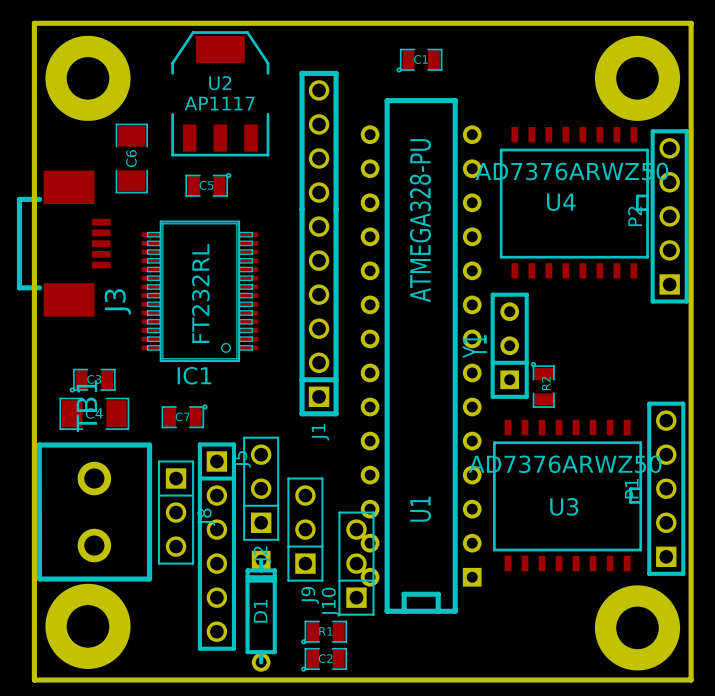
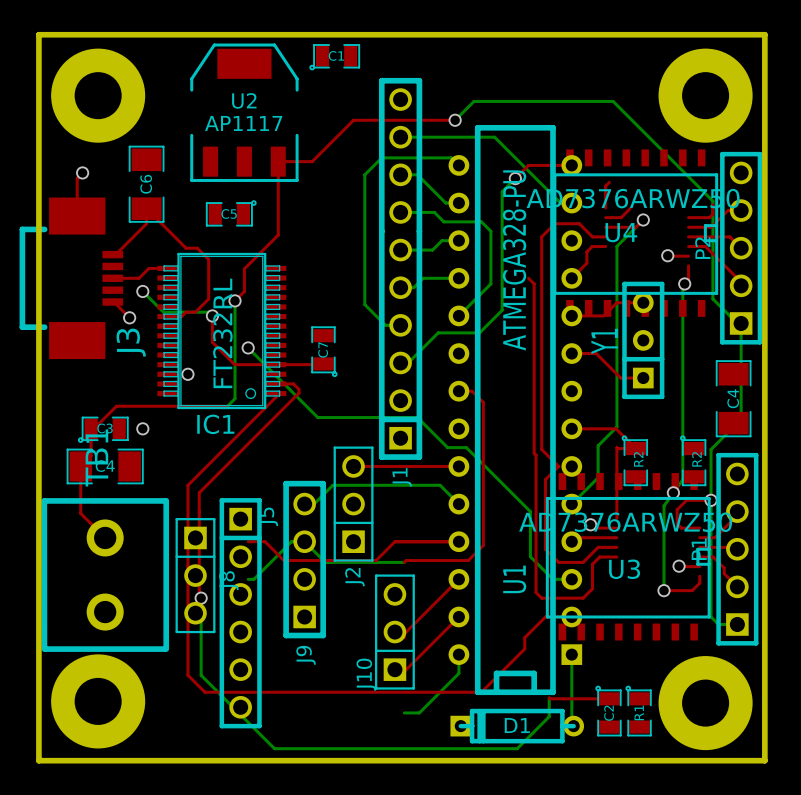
C1 position: (419, 60) -> (334, 57)
top track: none -> (455, 120) (353, 120) (312, 161) (278, 161) (278, 235) (244, 268) (244, 291) (235, 300)
bottom track: none -> (455, 120) (473, 101) (613, 101) (712, 201) (712, 299) (737, 323) (741, 323) (741, 419) (711, 449) (711, 616) (718, 624) (737, 624)
via: none -> (455, 120)
bottom track: none -> (400, 137) (494, 137) (560, 203) (571, 203)
bottom track: none -> (458, 165) (451, 157) (381, 157) (364, 174) (364, 304) (385, 325) (400, 325)
top track: none -> (571, 165) (528, 165) (515, 178)
top track: none -> (82, 172) (77, 178) (77, 216)
via: none -> (82, 172)
bottom track: none -> (400, 174) (417, 174) (445, 203) (458, 203)
bottom track: none -> (515, 178) (502, 191) (502, 310) (479, 332) (438, 332) (408, 362) (400, 362)
via: none -> (515, 178)
top track: none -> (609, 182) (605, 186) (605, 208)
top track: none -> (712, 204) (712, 214) (709, 217) (688, 217)
top track: none -> (630, 208) (621, 217) (605, 217)
top track: none -> (741, 210) (727, 210) (711, 227) (688, 227)
bottom track: none -> (400, 212) (434, 212) (443, 221) (481, 221) (490, 231) (490, 283) (458, 315)
top track: none -> (643, 219) (636, 227) (605, 227)
bottom track: none -> (643, 219) (616, 246) (616, 426) (598, 445) (598, 477) (571, 504)
via: none -> (643, 219)
top track: none -> (605, 236) (592, 236) (579, 223) (554, 223) (541, 236) (541, 449) (558, 466) (545, 479) (545, 549) (558, 562) (583, 562) (598, 547) (616, 547)
top track: none -> (688, 236) (729, 236) (741, 248)
bottom track: none -> (458, 240) (441, 240) (432, 250) (400, 250)
top track: none -> (605, 246) (592, 246) (586, 251) (586, 263) (571, 278)
top track: none -> (688, 246) (705, 246) (741, 282) (741, 285)
top track: none -> (112, 254) (115, 254) (146, 223) (146, 208) (186, 248) (197, 248) (208, 259) (208, 299) (195, 312) (186, 312) (181, 316) (167, 316)
top track: none -> (667, 255) (688, 256)
via: none -> (667, 255)
top track: none -> (688, 265) (688, 280) (684, 283)
top track: none -> (167, 268) (148, 268) (139, 278) (112, 278)
J1 position: (319, 243) -> (400, 268)
bottom track: none -> (458, 278) (423, 278) (413, 287) (400, 287)
top track: none -> (528, 278) (534, 283) (536, 592) (541, 598) (583, 598) (592, 588) (592, 564) (599, 557) (616, 557)
bottom track: none -> (684, 283) (682, 285) (682, 479) (664, 505) (664, 590)
via: none -> (684, 283)
bottom track: none -> (142, 291) (163, 312) (208, 312) (212, 315)
via: none -> (142, 291)
bottom track: none -> (235, 300) (235, 398) (227, 406)
via: none -> (235, 300)
top track: none -> (112, 302) (129, 317)
top track: none -> (643, 302) (616, 302) (603, 315) (571, 315)
top track: none -> (212, 315) (212, 342) (234, 364) (323, 363)
via: none -> (212, 315)
via: none -> (129, 317)
bottom track: none -> (248, 347) (317, 417) (417, 417) (447, 447) (466, 447) (530, 511) (530, 556) (552, 579) (571, 579)
via: none -> (248, 347)
top track: none -> (571, 353) (596, 353) (620, 378) (643, 378)
via: none -> (187, 374)
top track: none -> (275, 383) (293, 383) (298, 389) (298, 393) (199, 492) (199, 590) (201, 598)
top track: none -> (458, 391) (472, 391) (483, 402) (483, 545) (468, 560) (406, 560) (404, 562)
Y1 position: (509, 345) -> (643, 340)
top track: none -> (275, 393) (275, 397) (187, 485) (187, 675) (204, 692) (481, 692) (524, 648) (524, 637) (545, 616) (571, 616)
C4: none -> (733, 398)
U1 position: (421, 355) -> (515, 410)
top track: none -> (227, 406) (116, 406) (93, 428) (91, 428) (91, 456) (80, 466) (80, 513) (105, 537)
via: none -> (142, 428)
top track: none -> (571, 428) (616, 428) (635, 448) (616, 447) (616, 518)
R2 position: (542, 384) -> (634, 460)
R2: none -> (693, 460)
top track: none -> (353, 466) (458, 466)
C7 rotation: 0° (184, 416) -> 90° clockwise (324, 351)
C7 position: (184, 416) -> (324, 351)
via: none -> (673, 492)
top track: none -> (711, 500) (686, 500) (677, 509) (677, 523) (681, 528) (699, 528)
via: none -> (711, 500)
bottom track: none -> (304, 504) (314, 504) (332, 485) (440, 485) (458, 504)
top track: none -> (737, 511) (737, 515) (715, 537) (699, 537)
top track: none -> (590, 524) (593, 528) (616, 528)
via: none -> (590, 524)
J9 footprint: [287, 477, 324, 582] -> [283, 480, 326, 639]
top track: none -> (616, 537) (575, 537) (571, 541)
top track: none -> (248, 541) (265, 541) (283, 560) (376, 560) (394, 541) (458, 541)
top track: none -> (699, 547) (735, 547) (737, 549)
J2 position: (261, 488) -> (353, 504)
top track: none -> (699, 557) (713, 557) (724, 568) (724, 573) (737, 586)
bottom track: none -> (404, 562) (325, 562) (304, 541) (291, 541) (253, 579) (248, 579)
top track: none -> (679, 566) (699, 566)
via: none -> (679, 566)
top track: none -> (699, 576) (699, 583) (692, 590) (664, 590)
top track: none -> (458, 579) (404, 633) (404, 637)
via: none -> (664, 590)
bottom track: none -> (201, 598) (201, 675) (274, 748) (517, 748) (549, 716) (549, 697)
via: none -> (201, 598)
top track: none -> (458, 616) (404, 671) (404, 675)
bottom track: none -> (458, 654) (458, 673) (419, 712) (404, 712)
bottom track: none -> (571, 654) (571, 724) (573, 726)
D1 rotation: 0° (261, 611) -> 90° counterclockwise (517, 726)
D1 position: (261, 611) -> (517, 726)
top track: none -> (549, 697) (609, 698)
R1 rotation: 0° (324, 632) -> 90° clockwise (638, 711)
R1 position: (324, 632) -> (638, 711)
C2 rotation: 0° (324, 659) -> 90° clockwise (608, 711)
C2 position: (324, 659) -> (608, 711)

